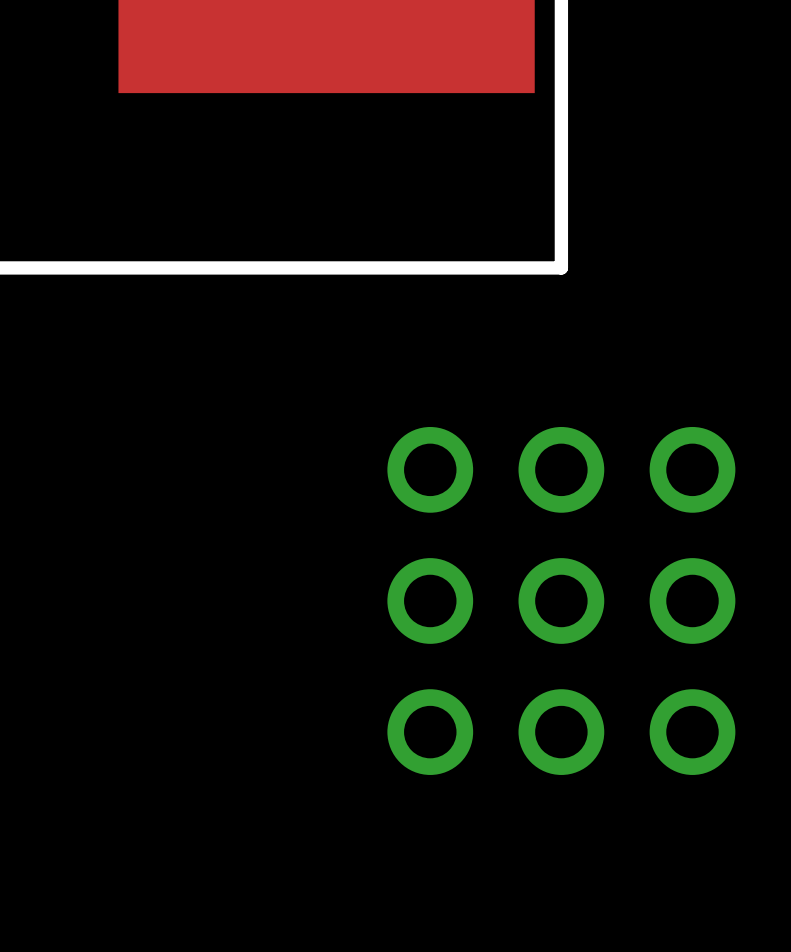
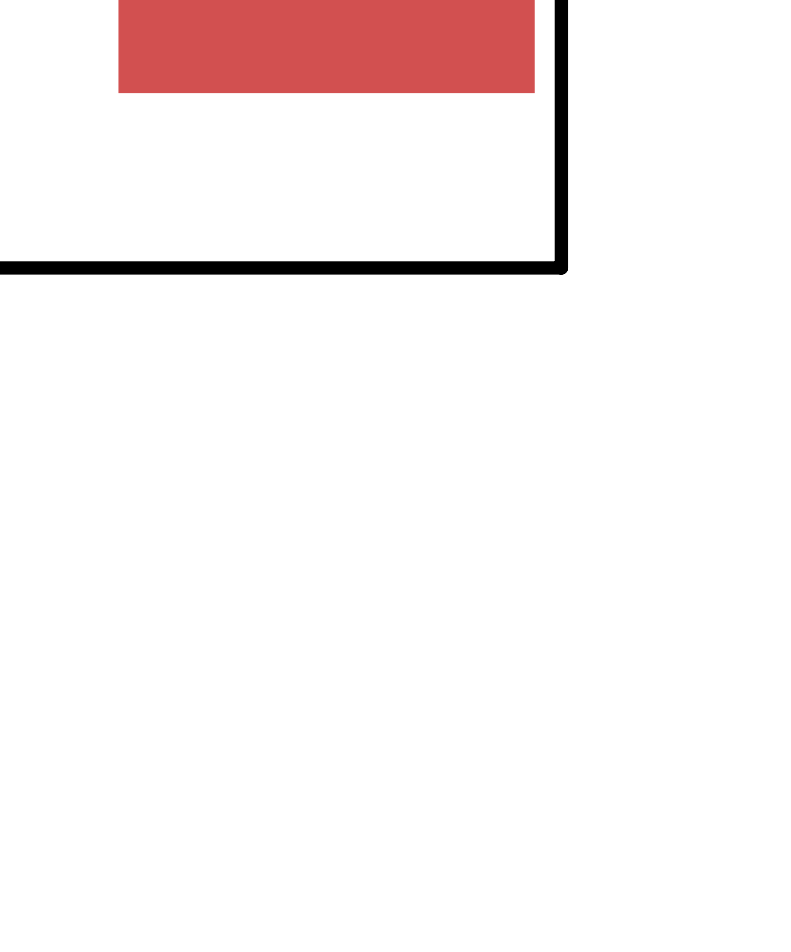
part: (561, 600) -> none

